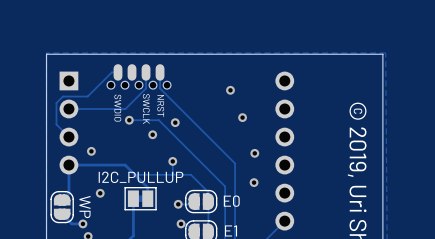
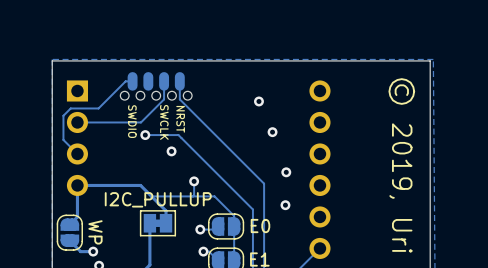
via: (175, 122) -> none
via: (91, 151) -> none
via: (100, 193) -> none

